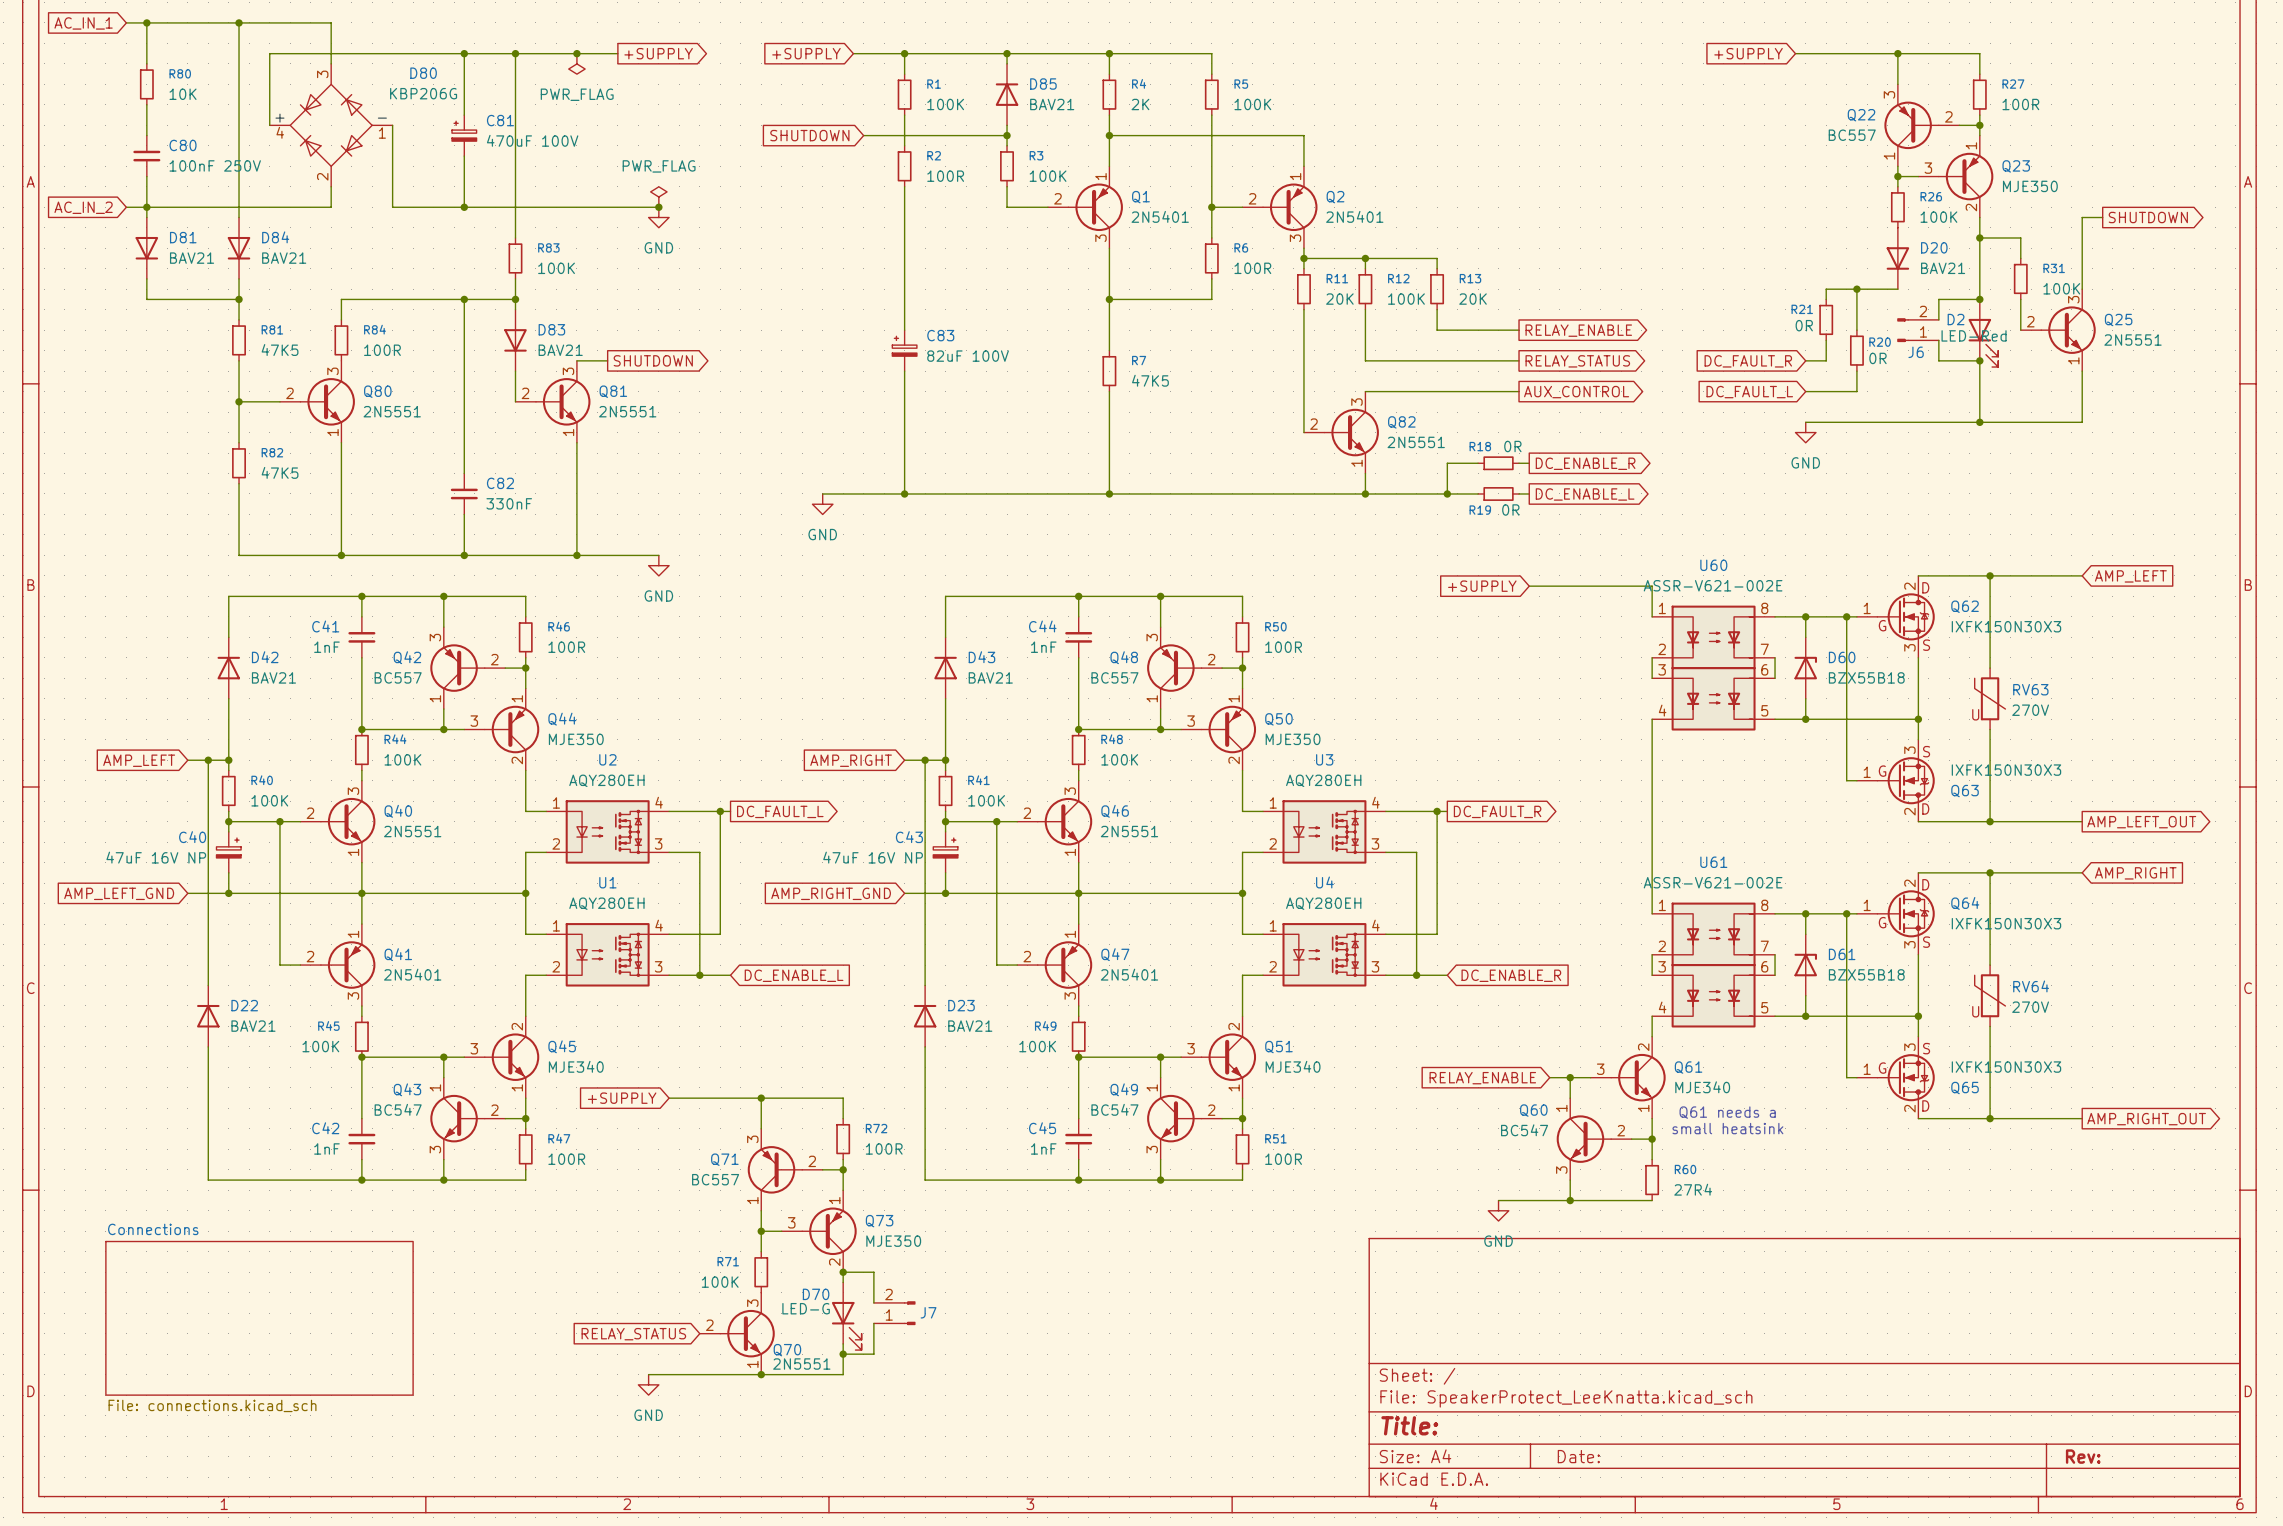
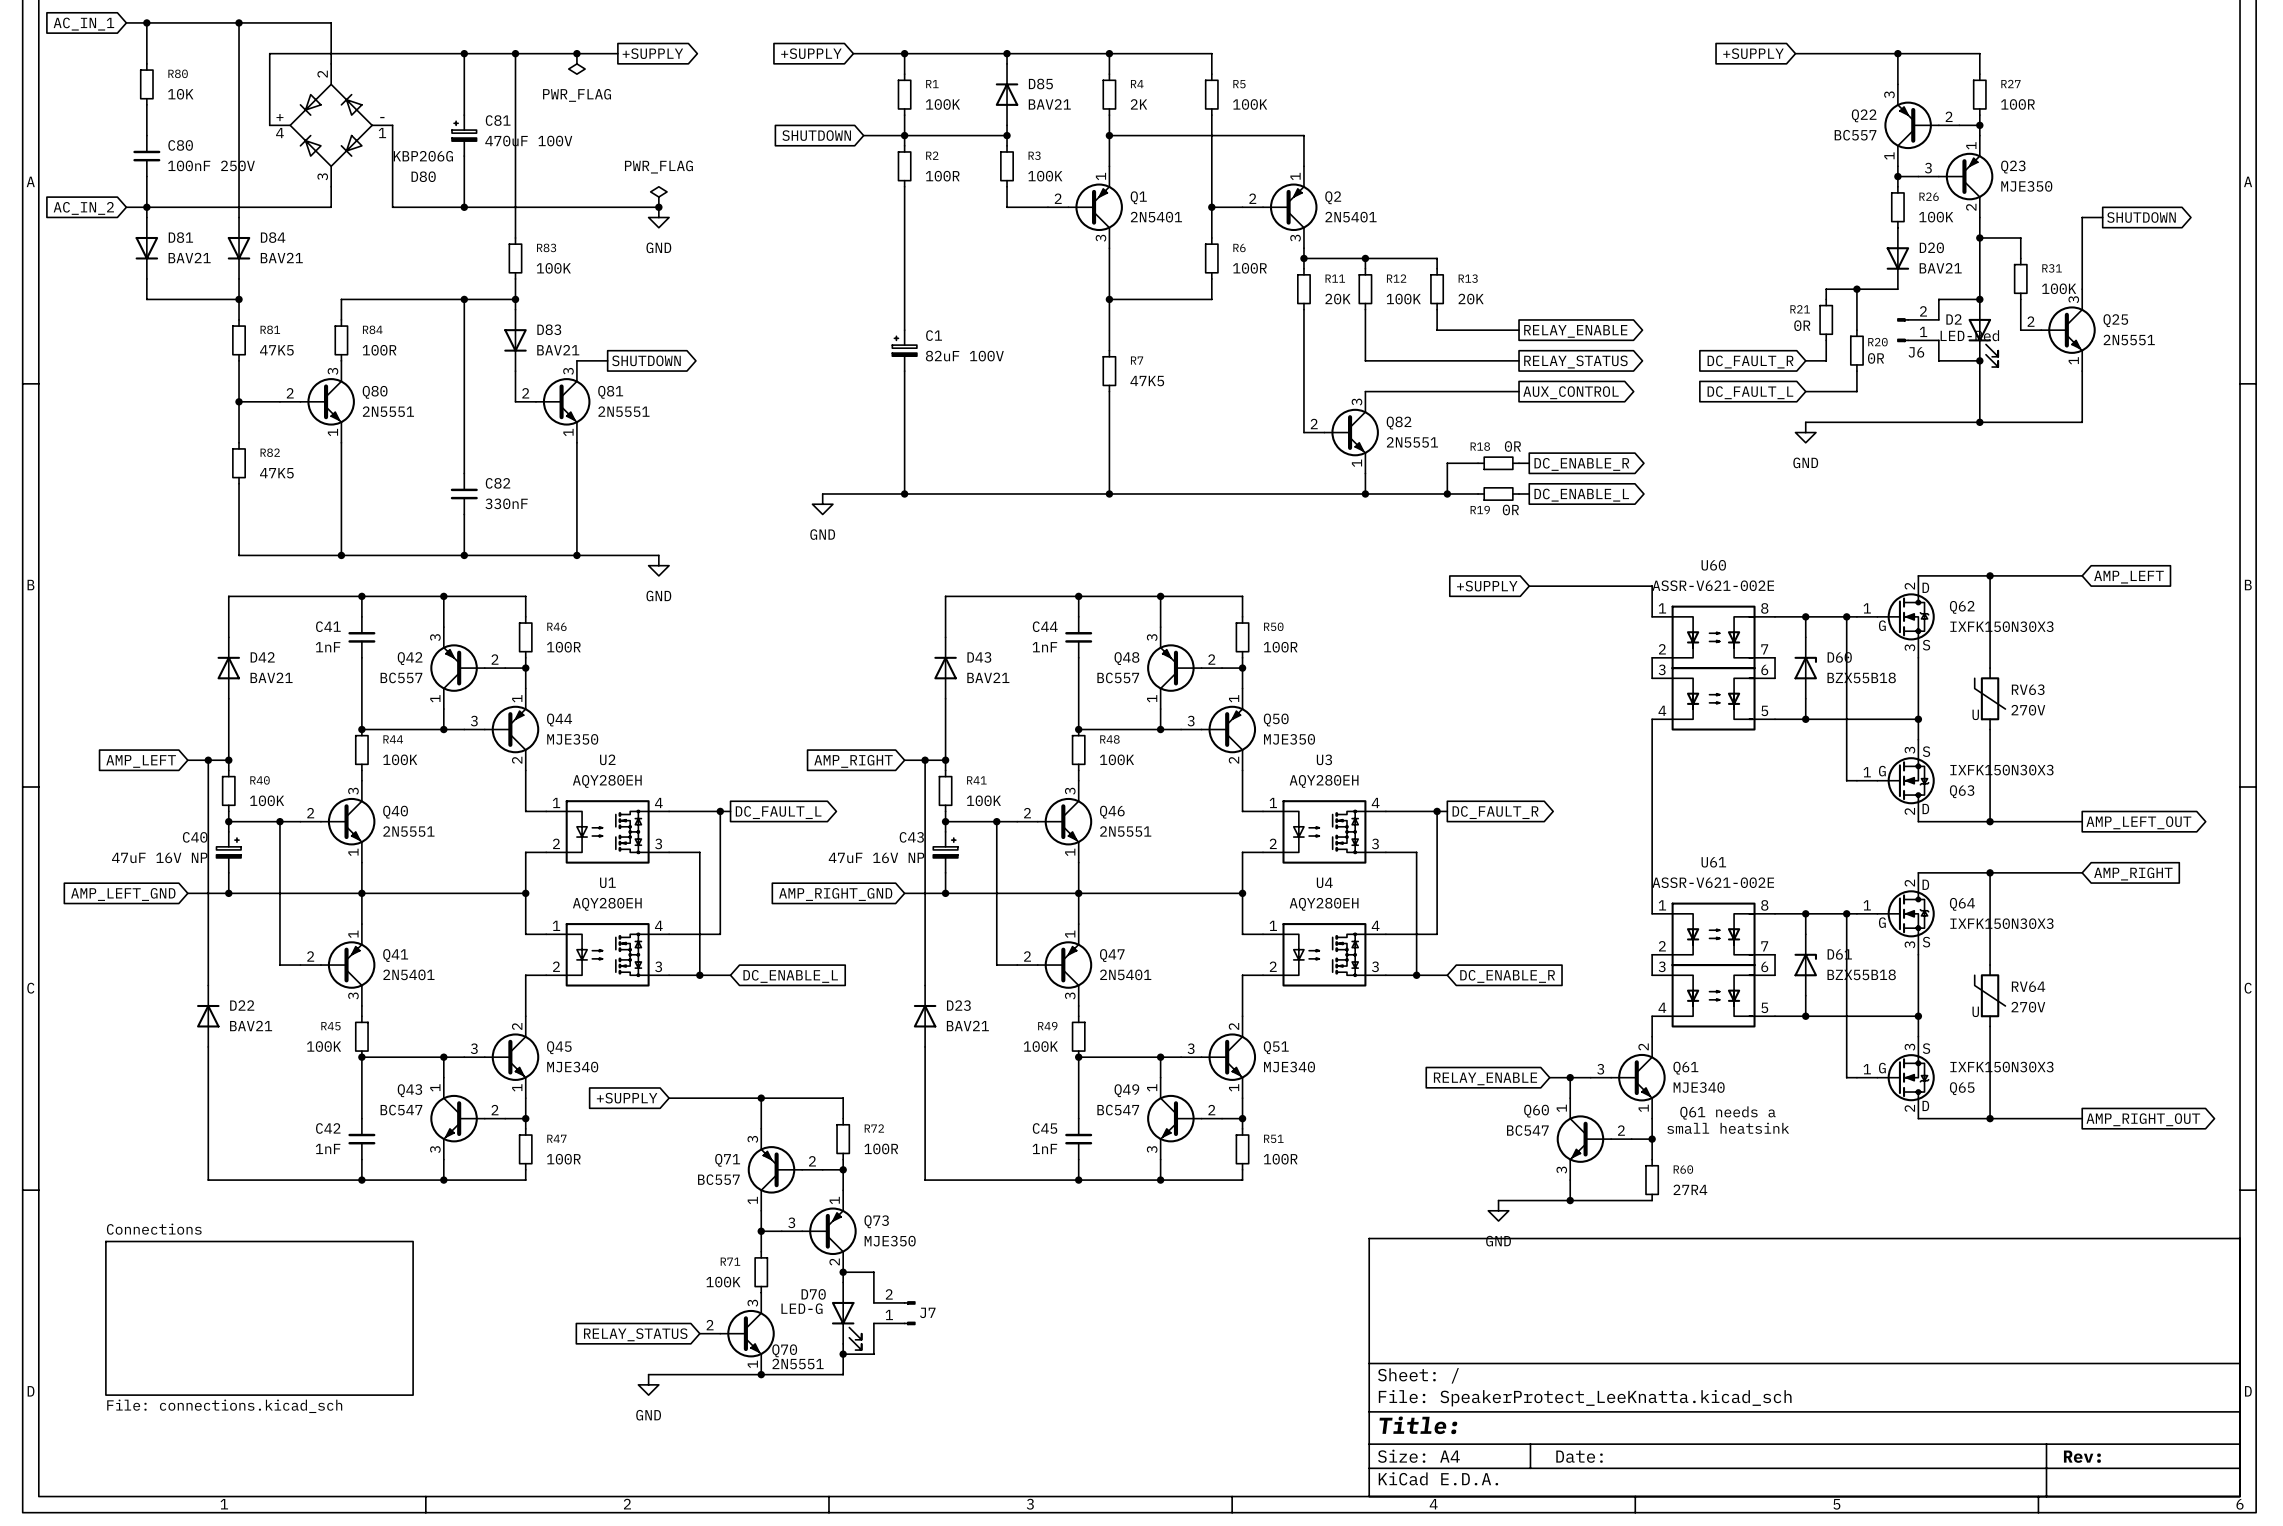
D80 flip: as is (331, 125) -> up-down (331, 125)
junction: none -> (904, 135)
C83 name: C83 (940, 335) -> C1 (934, 335)

